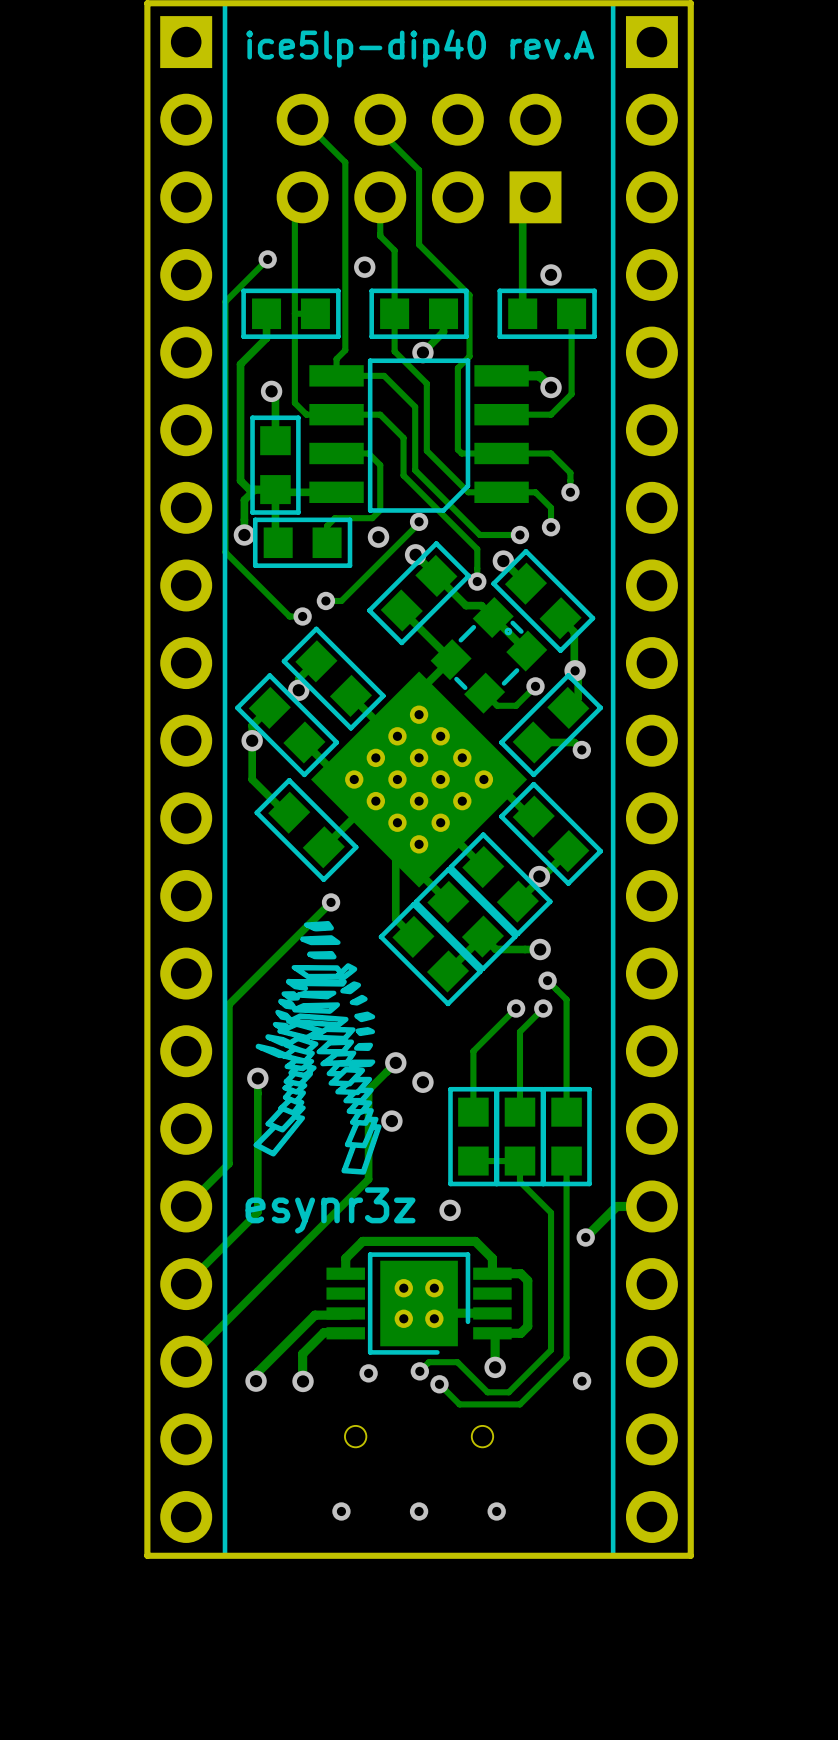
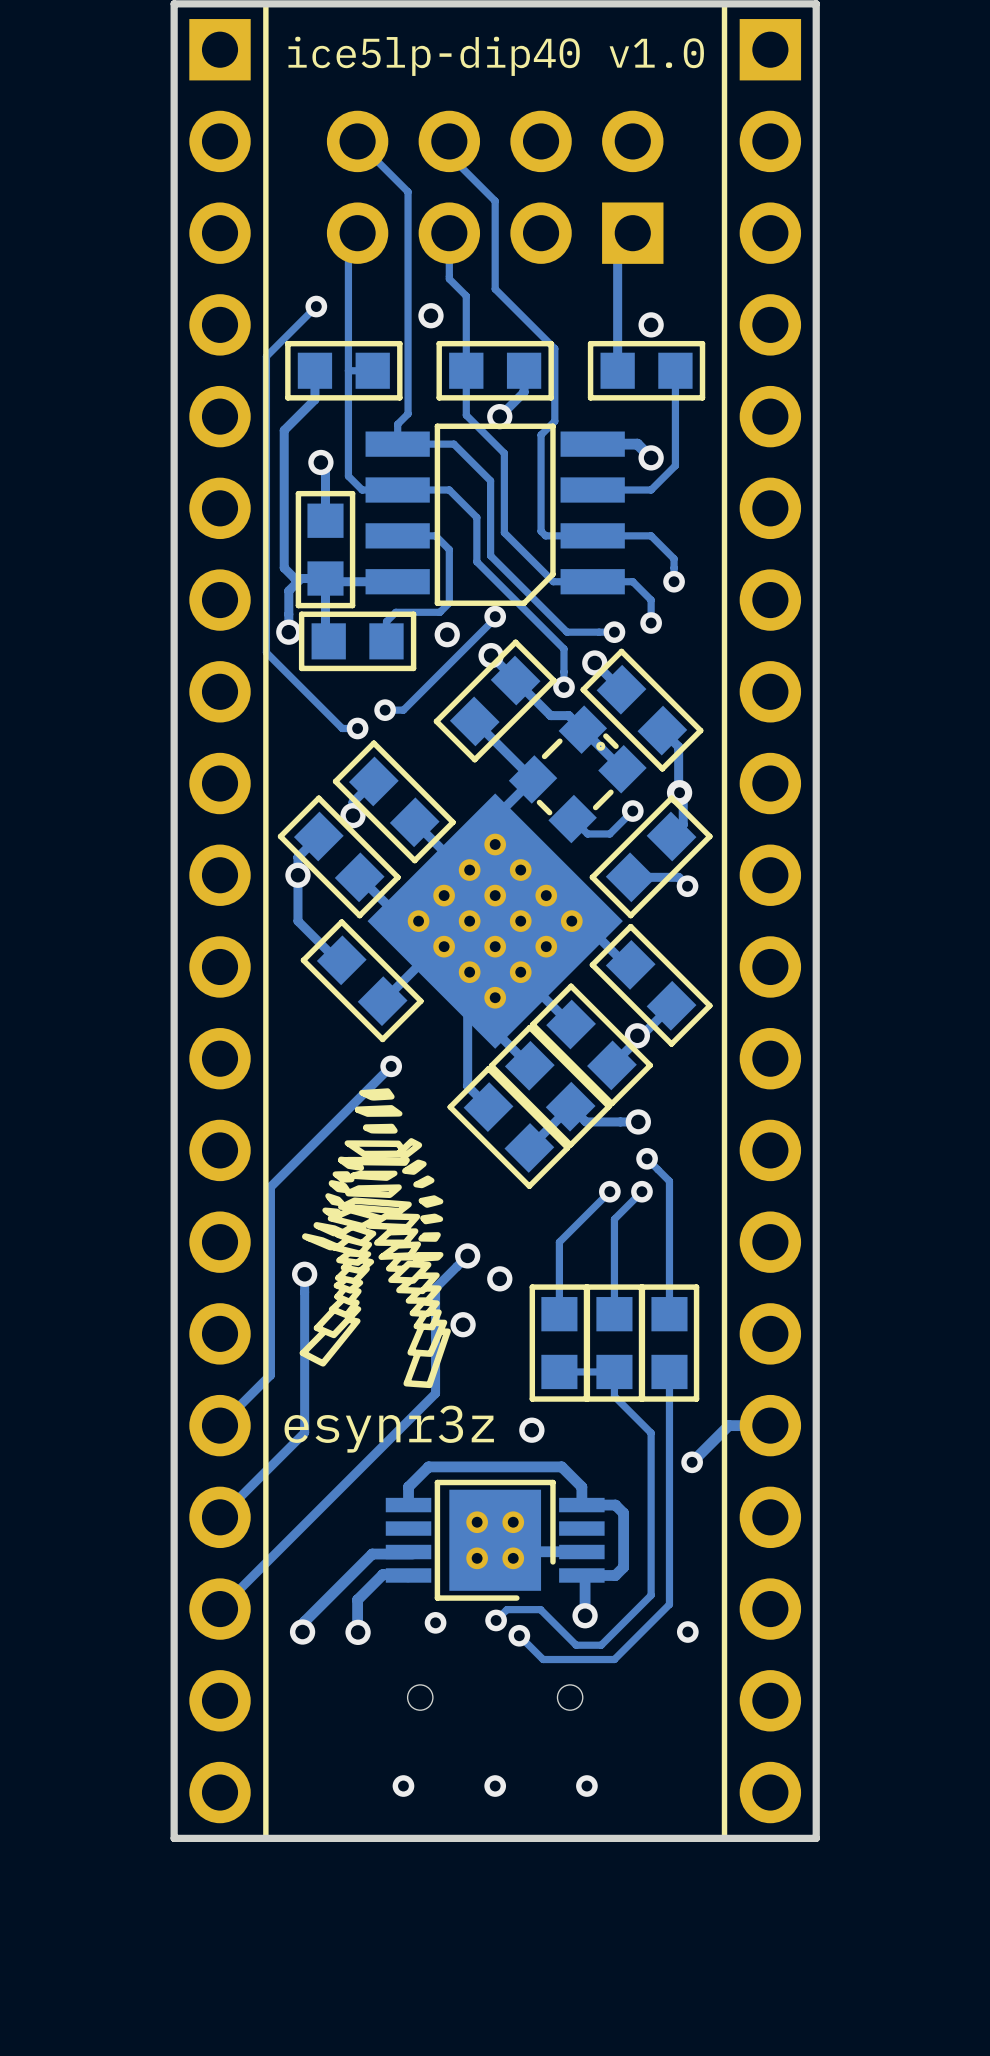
text: ice5lp-dip40 rev.A (420, 48) -> ice5lp-dip40 v1.0 (496, 56)

